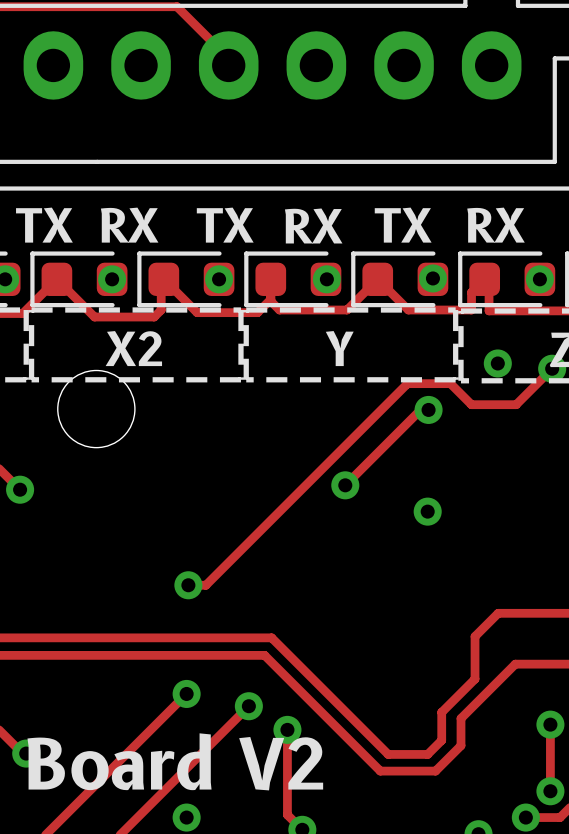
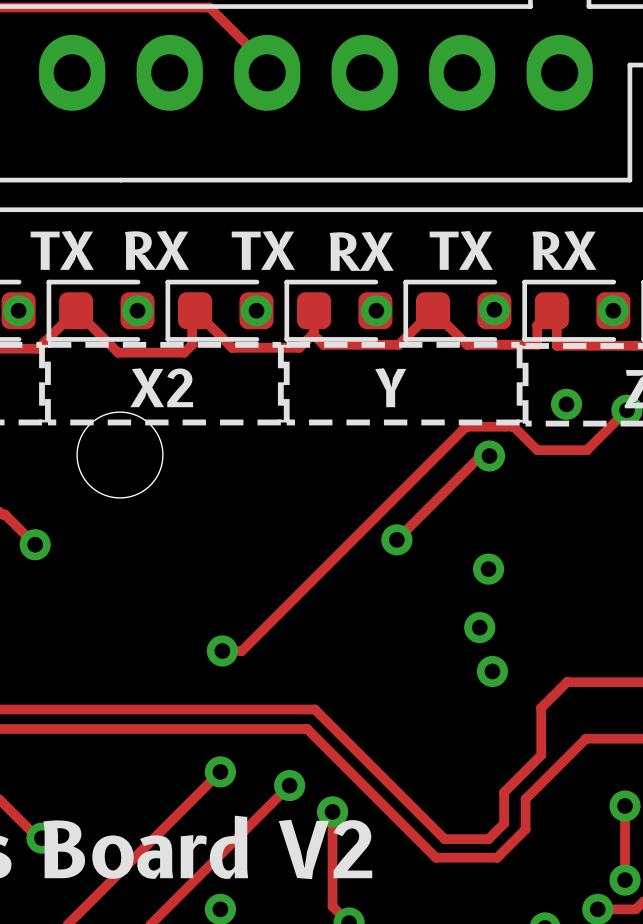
via: none -> (479, 627)
via: none -> (492, 671)

